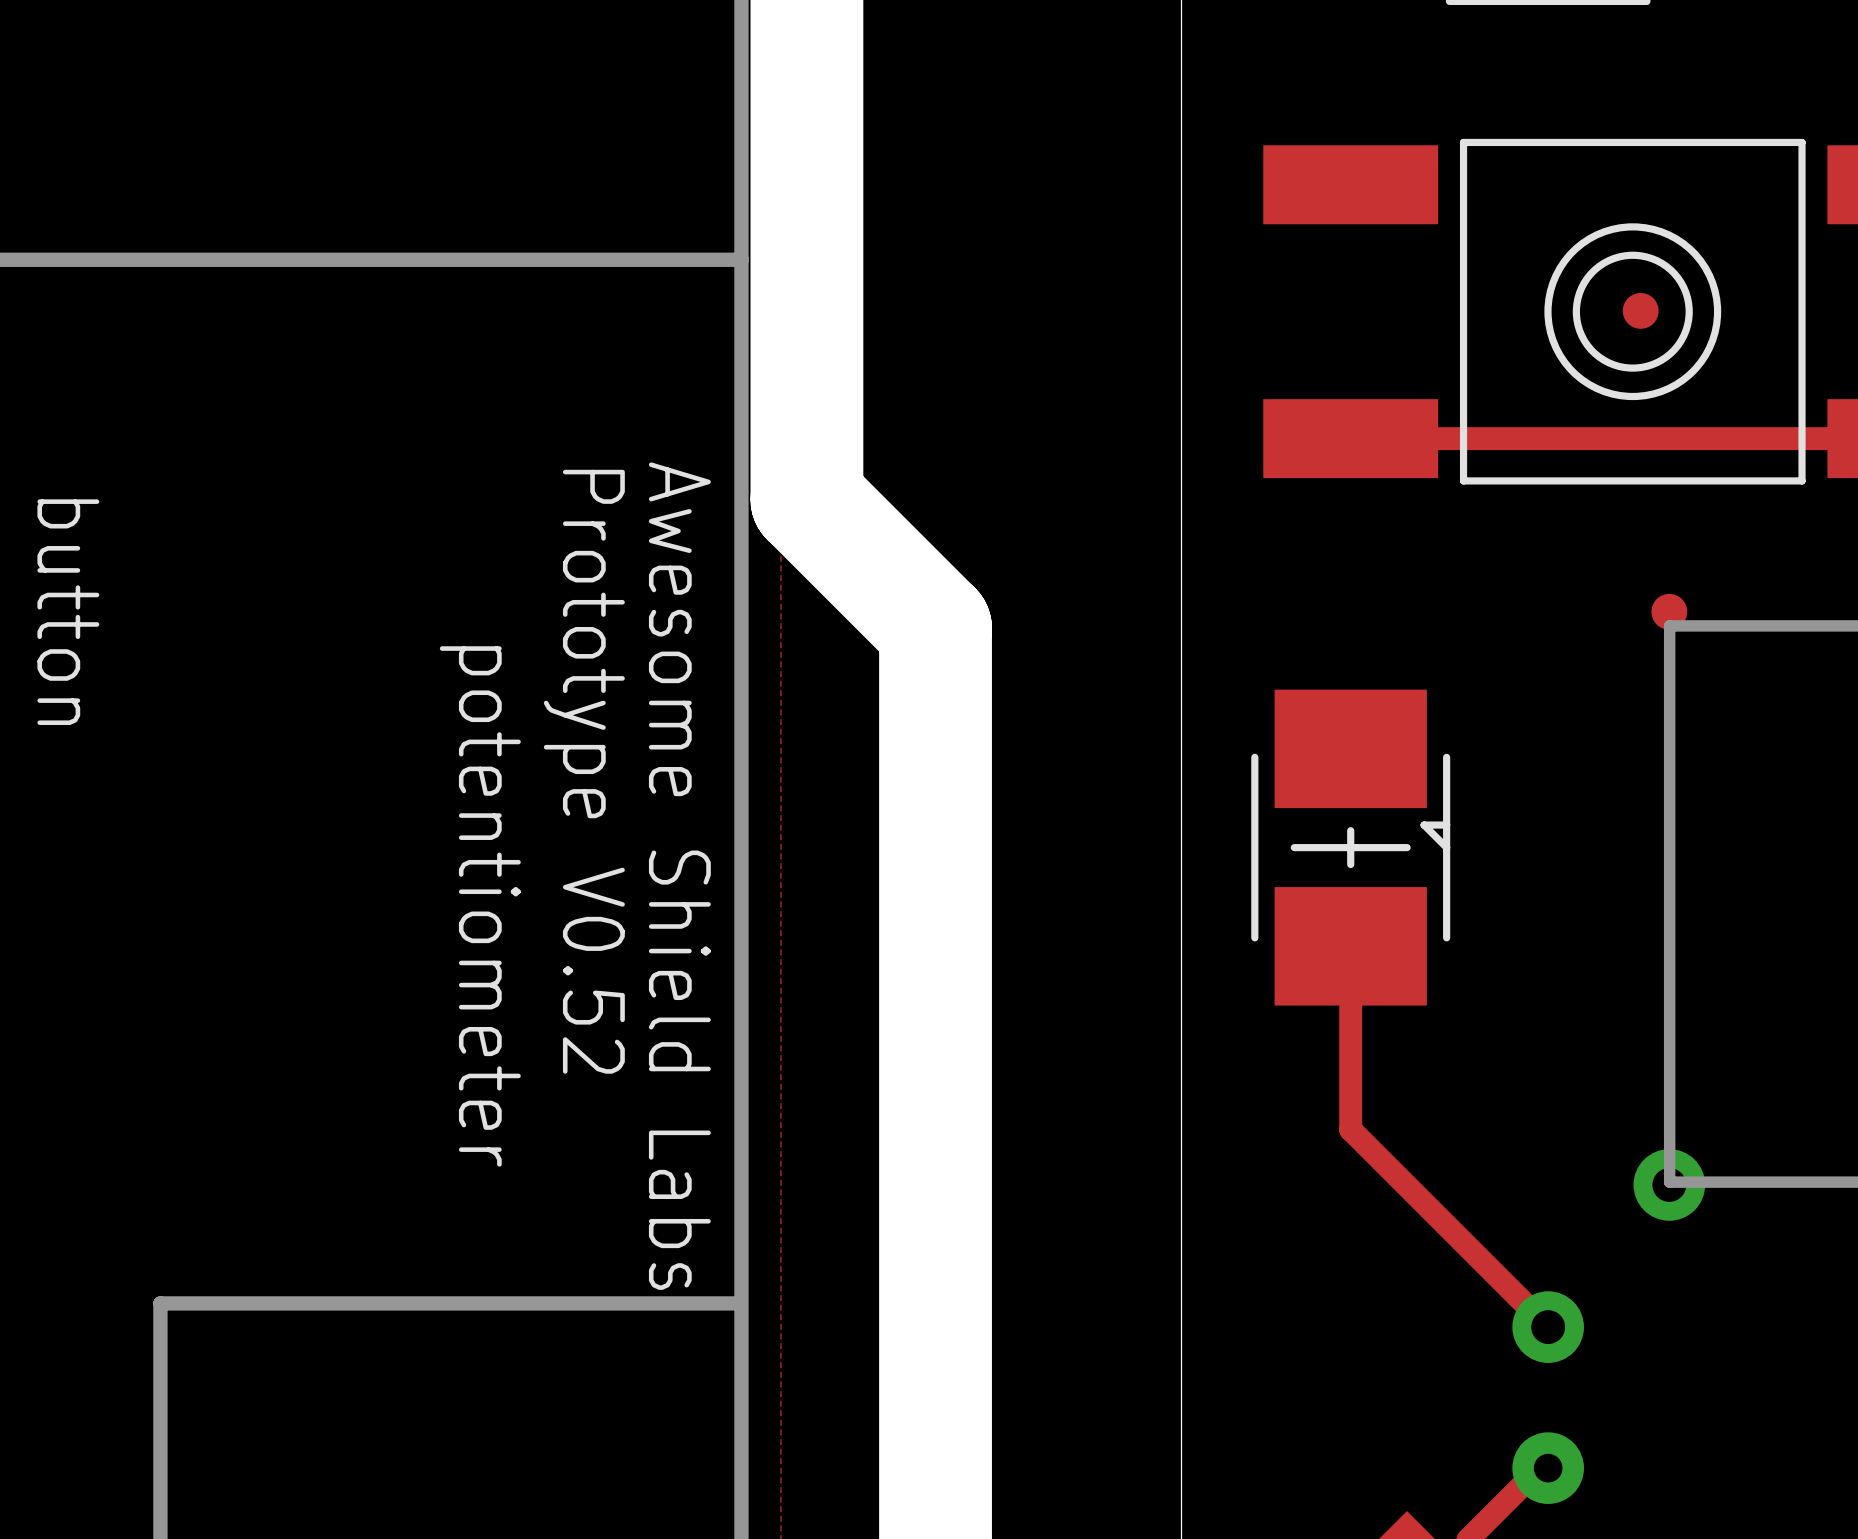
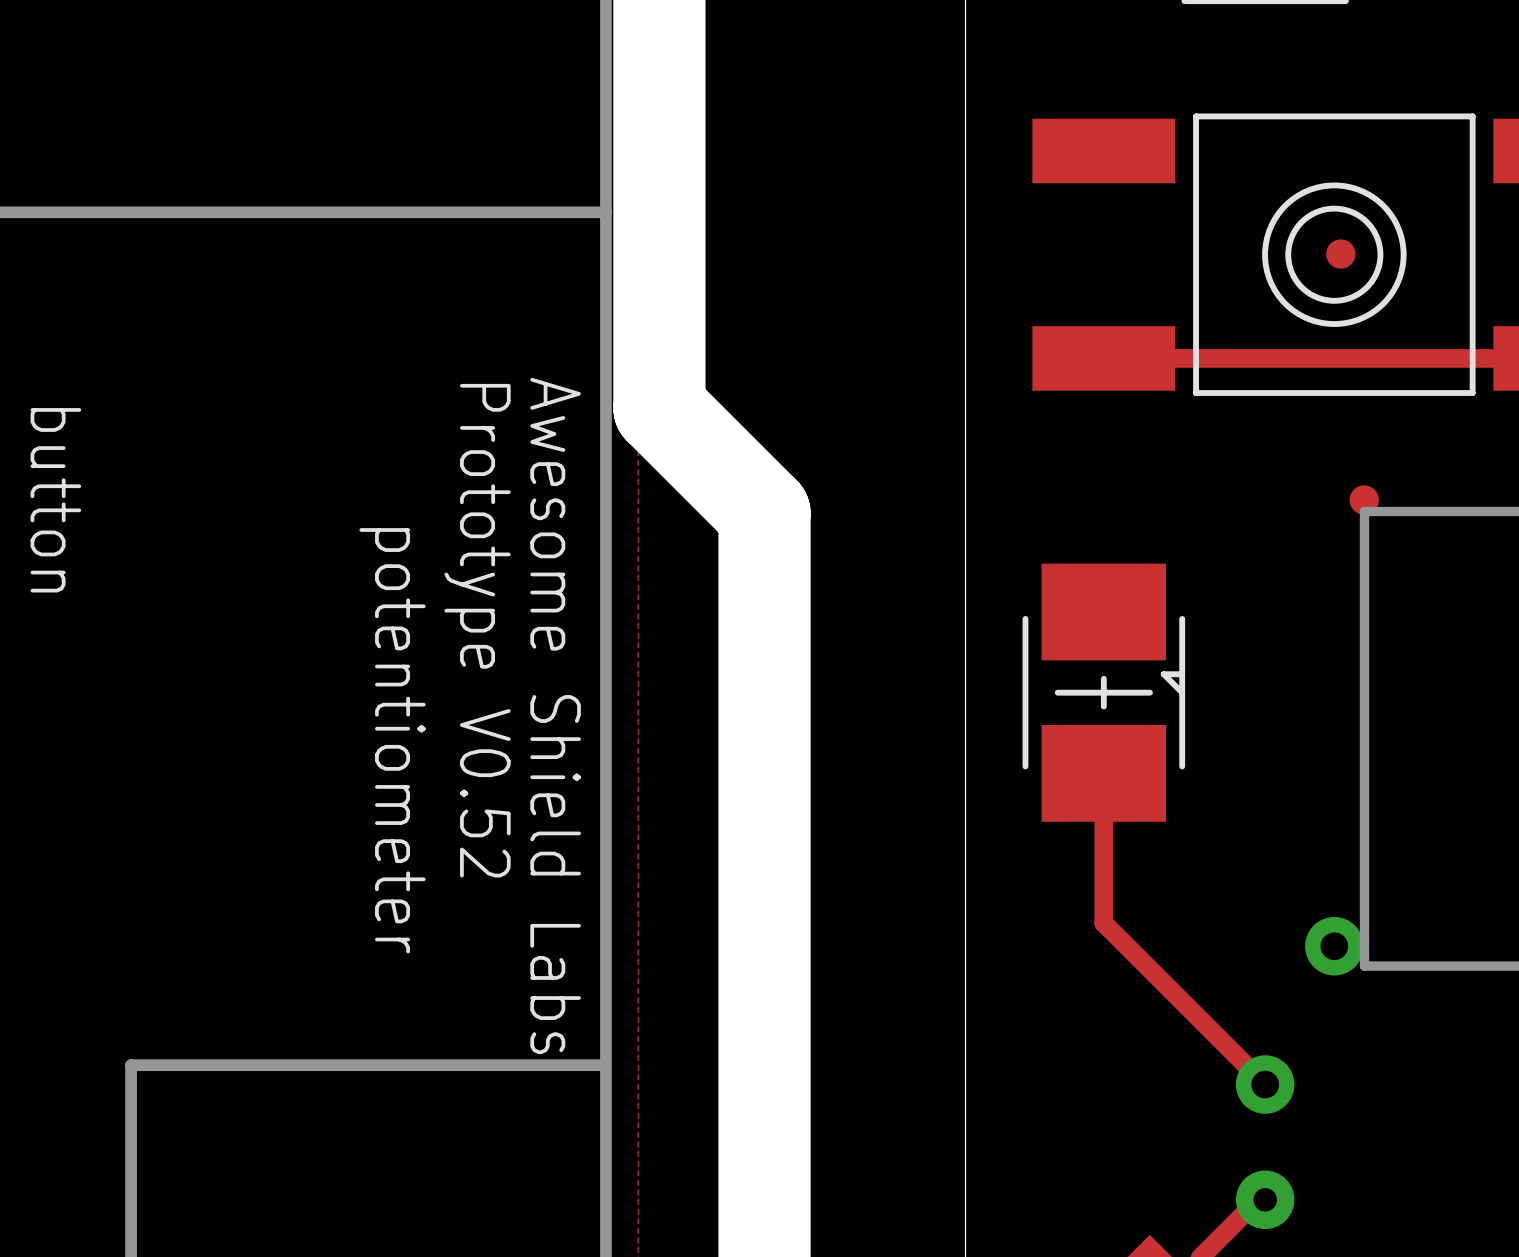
via position: (1669, 1184) -> (1334, 946)

